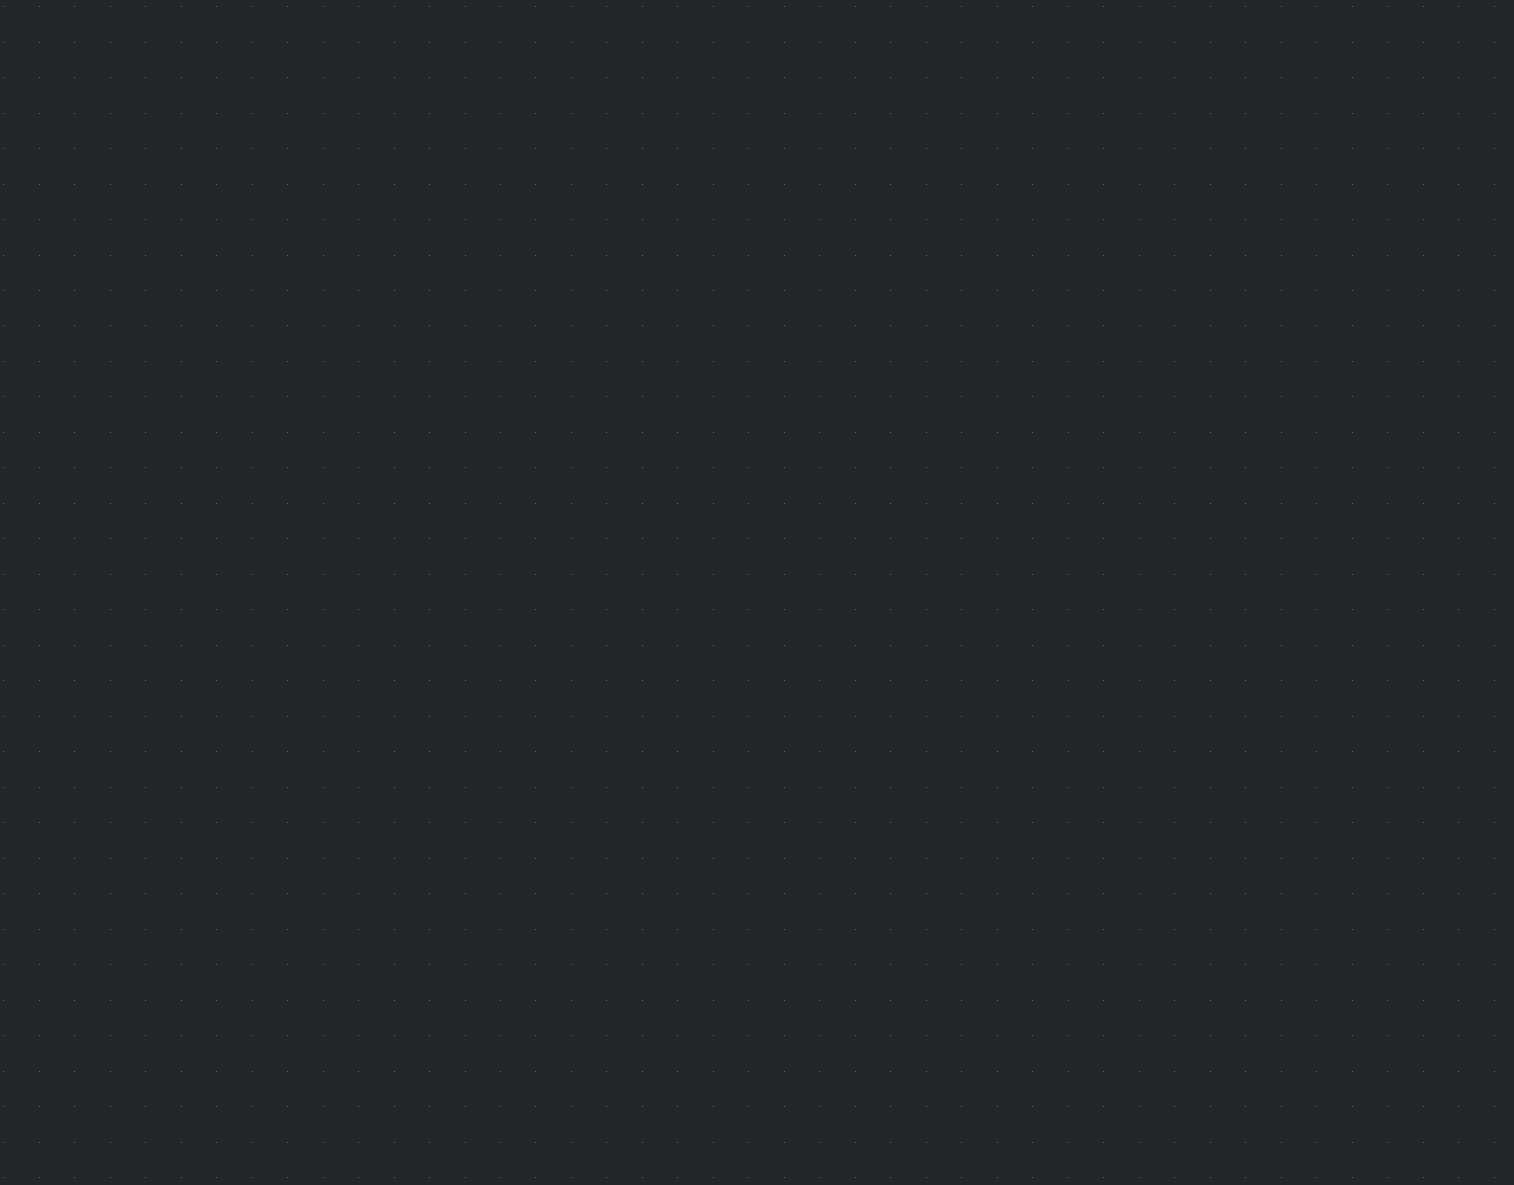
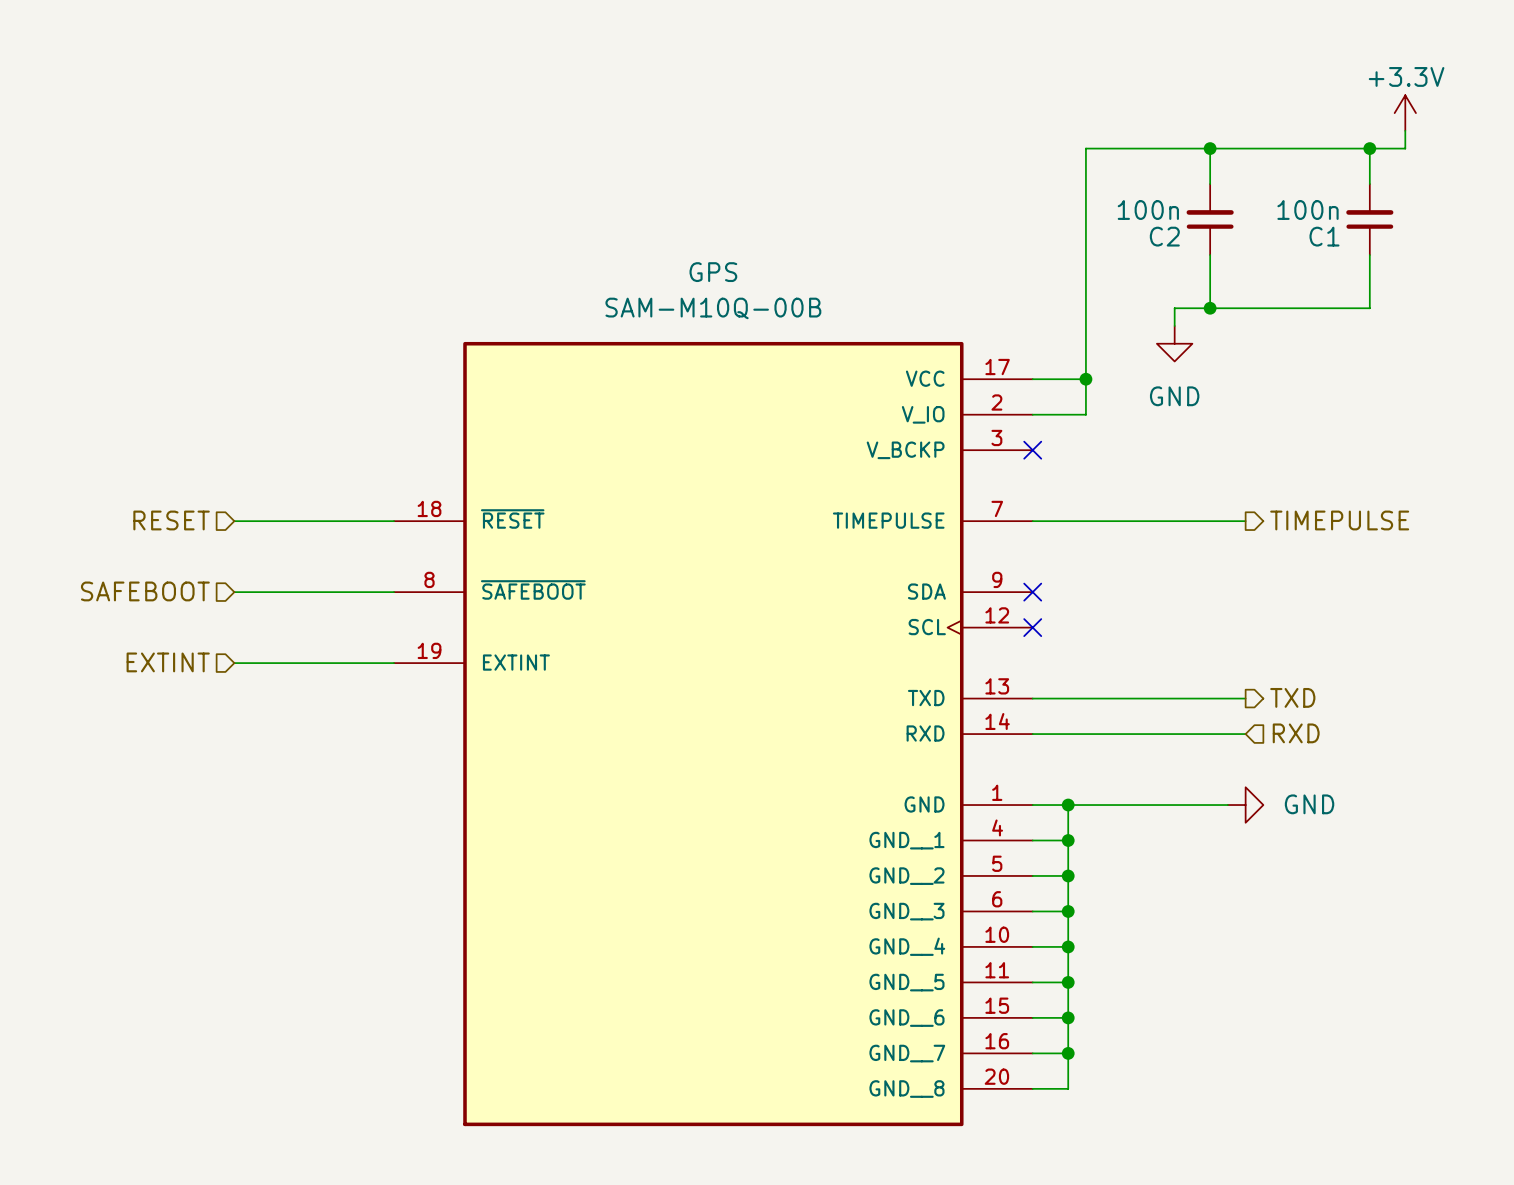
power symbol: none -> +3.3V (1405, 113)
wire: none -> (1405, 130) (1405, 148) (1085, 148) (1085, 414) (1032, 414)
wire: none -> (1210, 148) (1210, 184)
junction: none -> (1210, 148)
wire: none -> (1369, 148) (1369, 184)
junction: none -> (1369, 148)
C2: none -> 100n (1210, 219)
C1: none -> 100n (1369, 219)
wire: none -> (1210, 255) (1210, 308)
wire: none -> (1369, 255) (1369, 308) (1174, 308) (1174, 325)
junction: none -> (1210, 308)
power symbol: none -> GND (1174, 343)
wire: none -> (1032, 379) (1085, 379)
junction: none -> (1085, 379)
no-connect mark: none -> (1032, 450)
hierarchical label: none -> RESET (171, 520)
hierarchical label: none -> TIMEPULSE (1339, 520)
wire: none -> (234, 521) (394, 521)
wire: none -> (1032, 521) (1245, 521)
hierarchical label: none -> SAFEBOOT (145, 591)
wire: none -> (234, 592) (394, 592)
no-connect mark: none -> (1032, 592)
no-connect mark: none -> (1032, 627)
hierarchical label: none -> EXTINT (168, 662)
wire: none -> (234, 663) (394, 663)
hierarchical label: none -> TXD (1292, 697)
wire: none -> (1032, 698) (1245, 698)
hierarchical label: none -> RXD (1296, 733)
GPS: none -> SAM-M10Q-00B (713, 734)
wire: none -> (1032, 734) (1245, 734)
wire: none -> (1032, 805) (1227, 805)
wire: none -> (1068, 805) (1068, 1088) (1032, 1088)
junction: none -> (1068, 805)
power symbol: none -> GND (1245, 805)
wire: none -> (1032, 840) (1068, 840)
junction: none -> (1068, 840)
wire: none -> (1032, 875) (1068, 875)
junction: none -> (1068, 875)
wire: none -> (1032, 911) (1068, 911)
junction: none -> (1068, 911)
wire: none -> (1032, 946) (1068, 946)
junction: none -> (1068, 946)
wire: none -> (1032, 982) (1068, 982)
junction: none -> (1068, 982)
wire: none -> (1032, 1017) (1068, 1017)
junction: none -> (1068, 1017)
wire: none -> (1032, 1053) (1068, 1053)
junction: none -> (1068, 1053)

